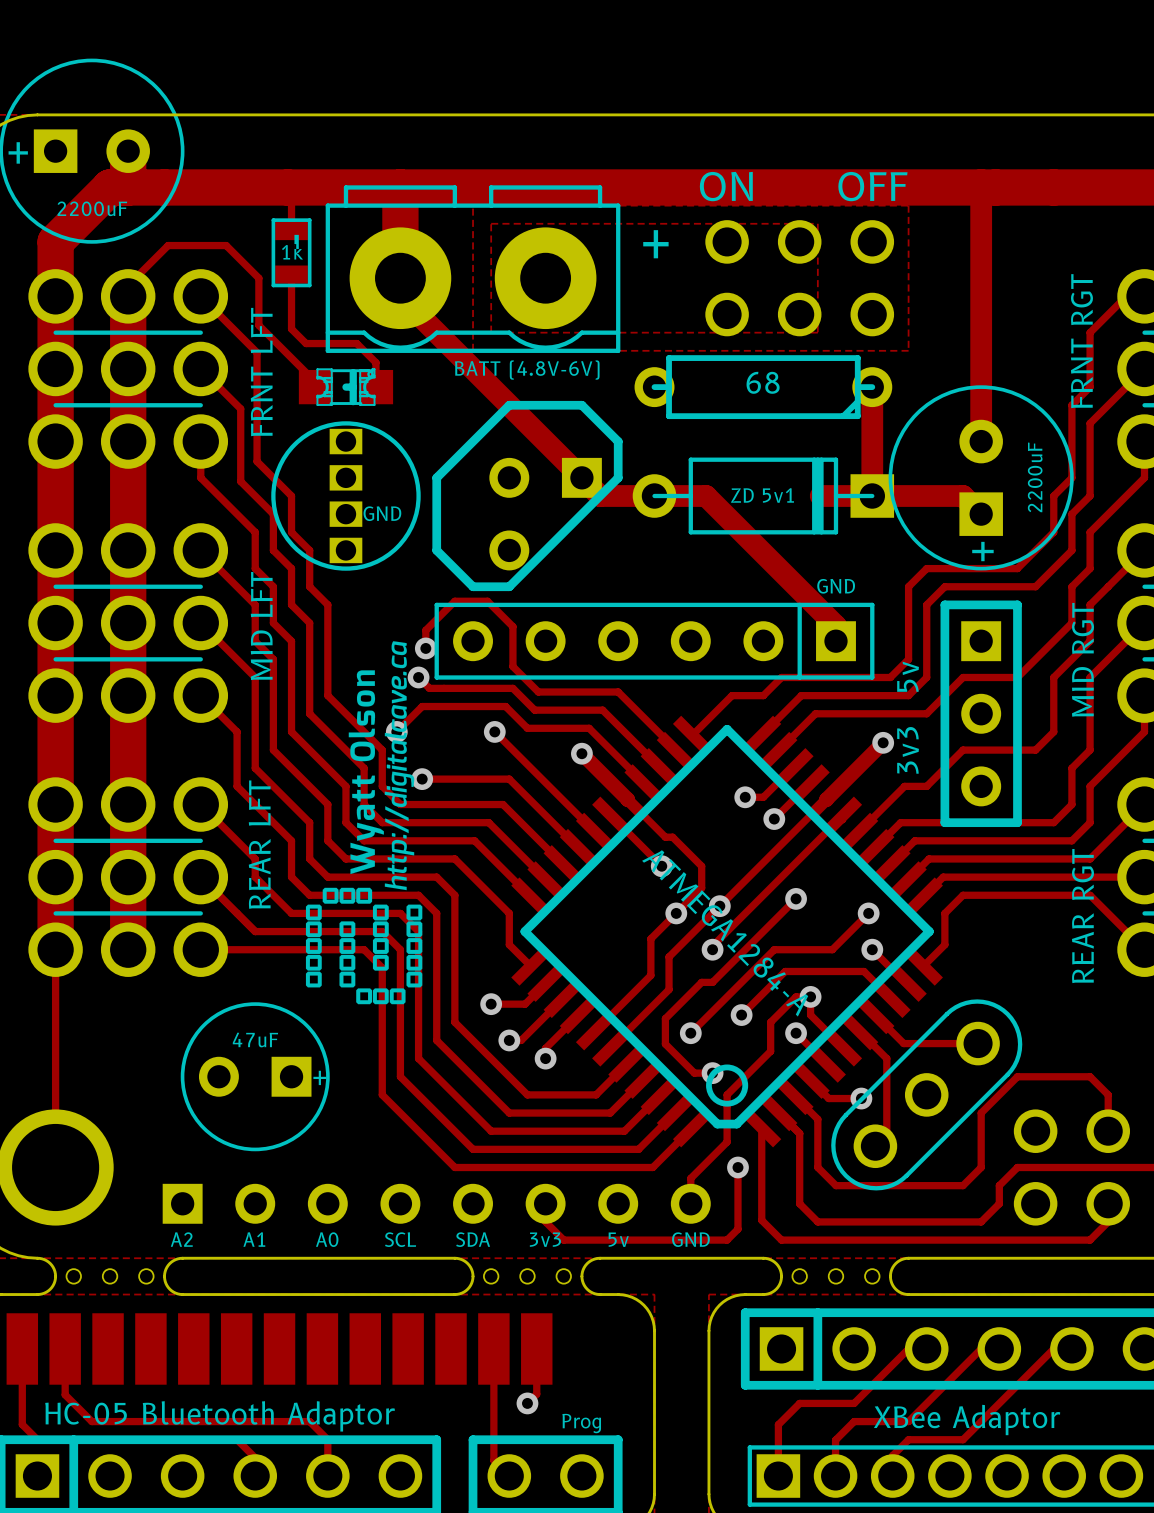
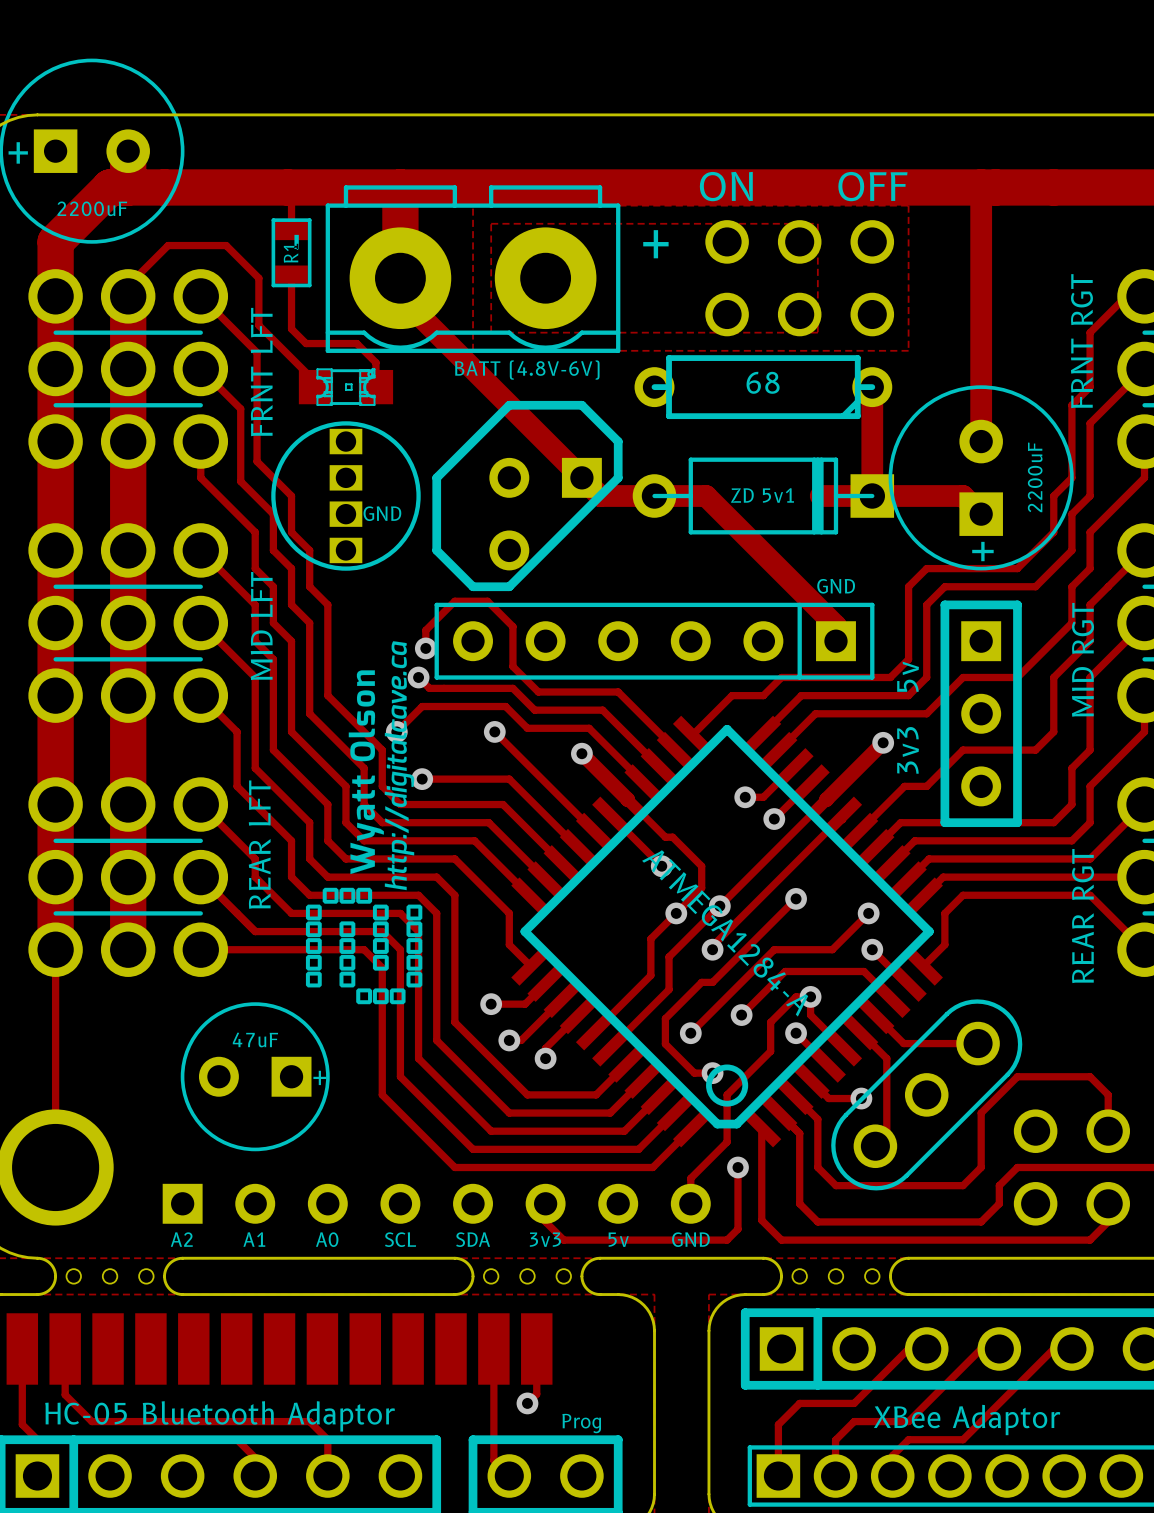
R1 value: 1k (292, 251) -> none
R1 name: none -> R1 (290, 253)
part footprint: [298, 368, 394, 406] -> [298, 368, 394, 406]

